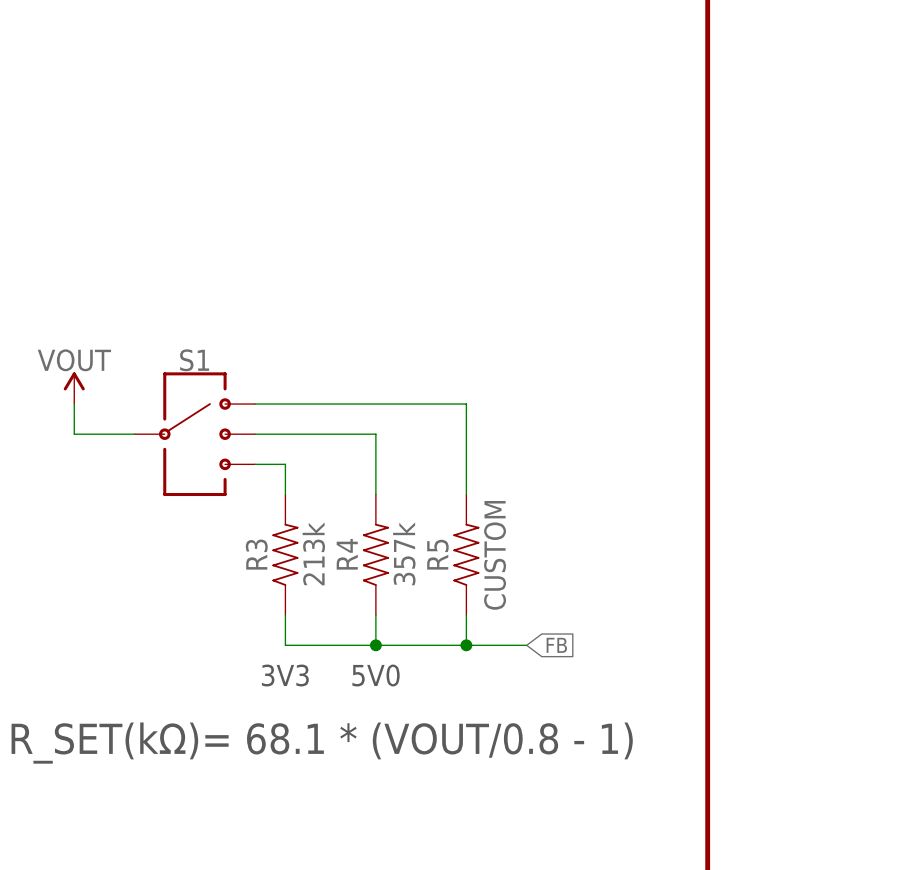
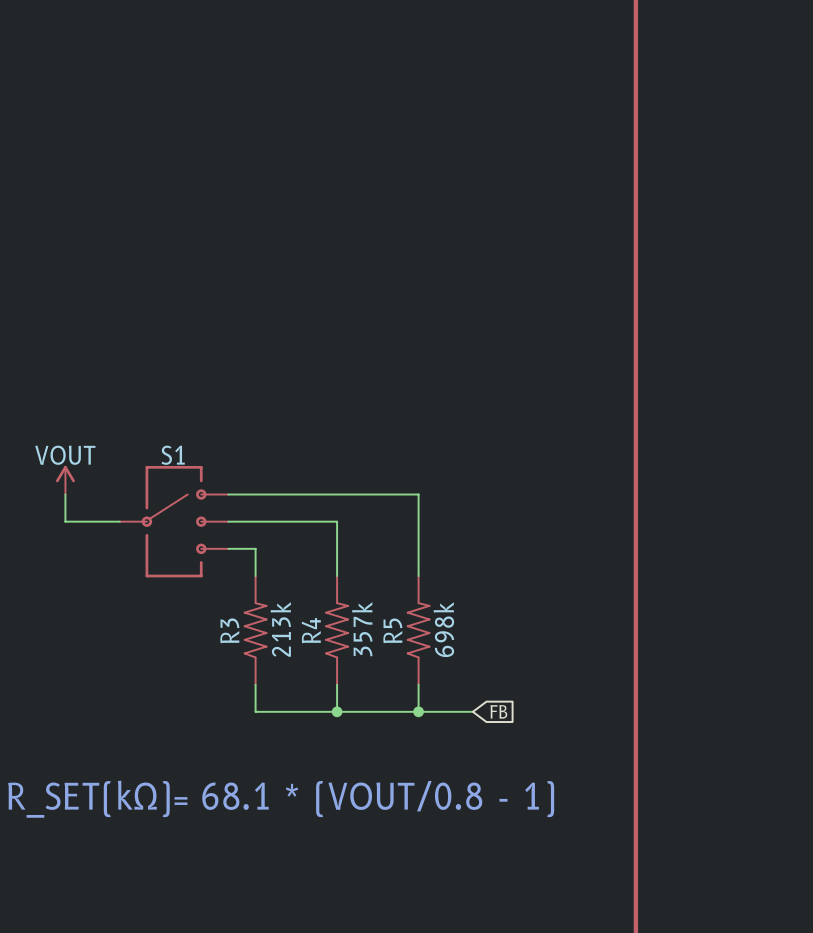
R5 value: CUSTOM (495, 555) -> 698k (443, 629)
text: 3V3 (285, 675) -> none
text: 5V0 (376, 675) -> none

